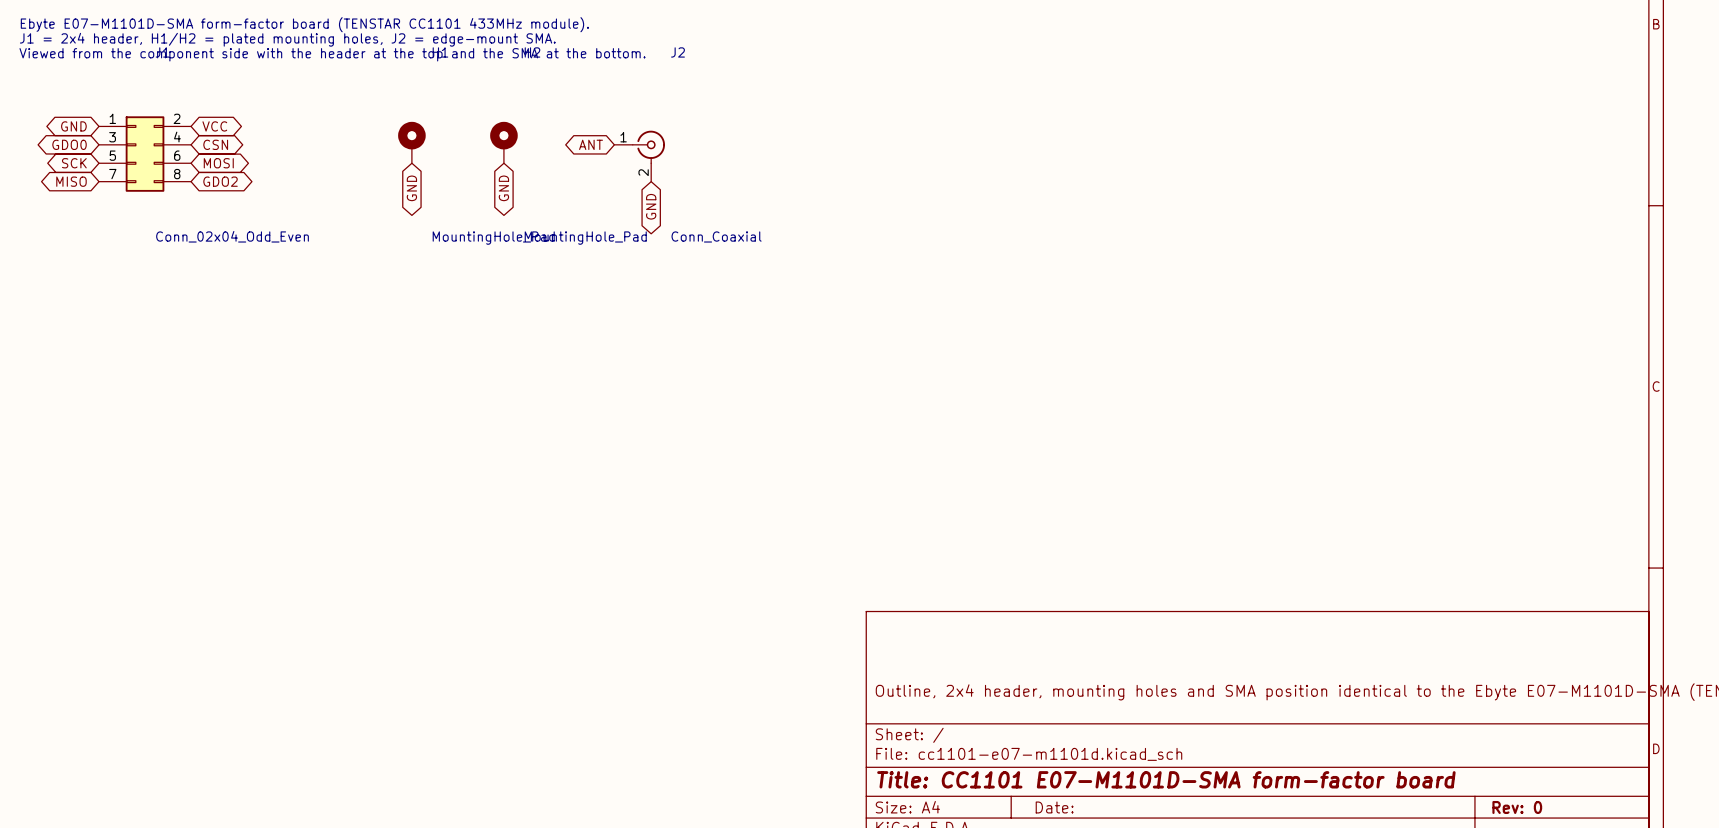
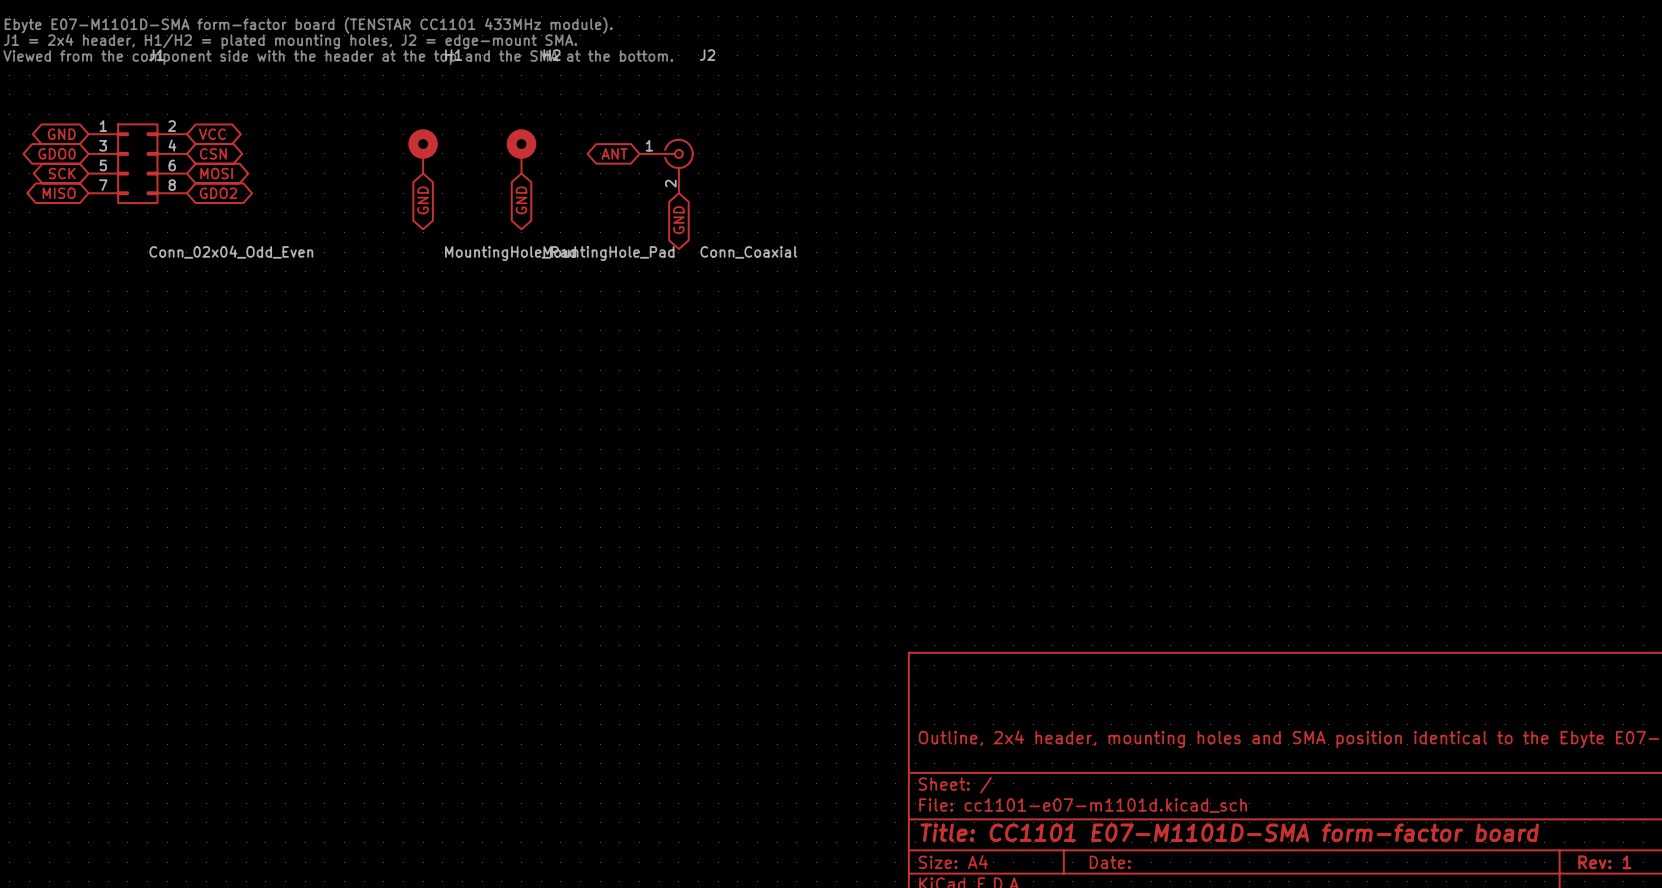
title block: Rev: 0 (1517, 807) -> Rev: 1 (1604, 862)

